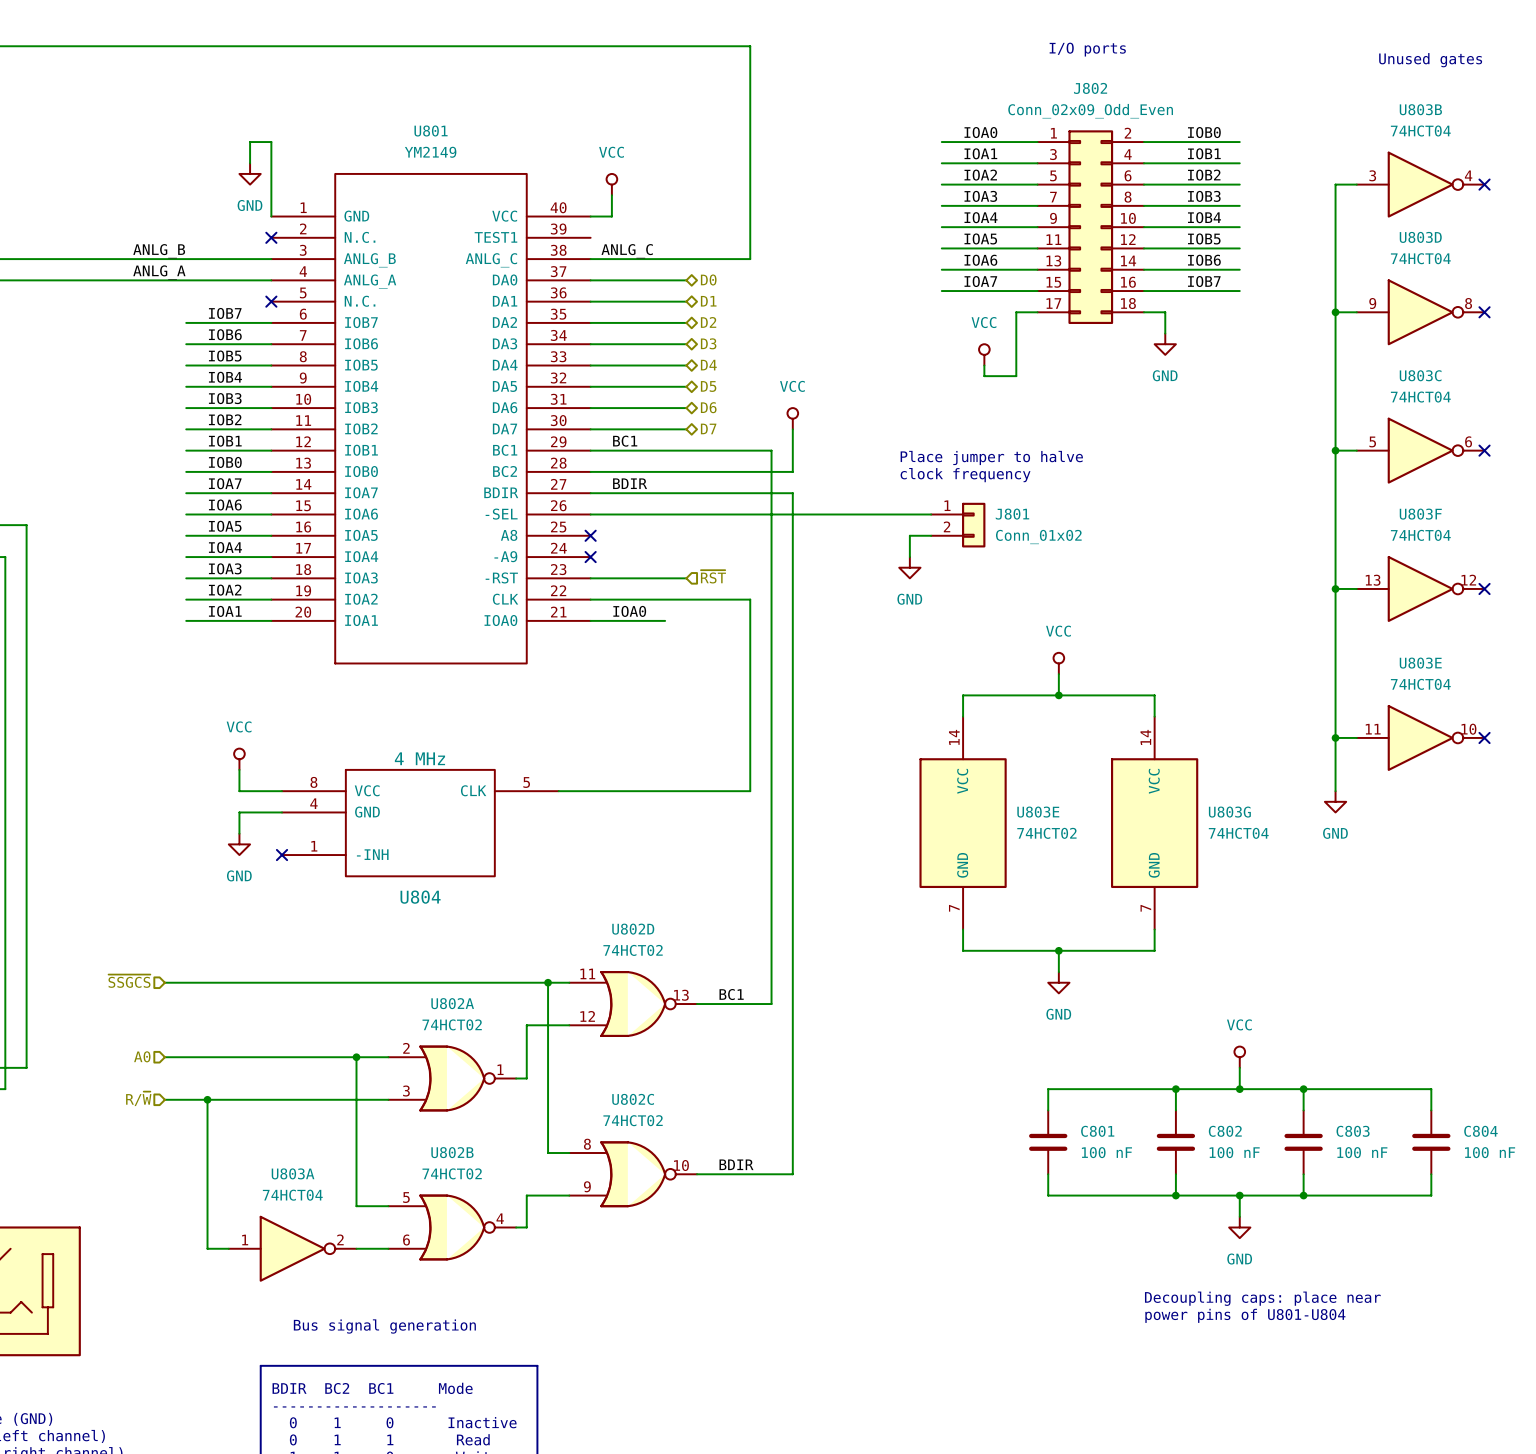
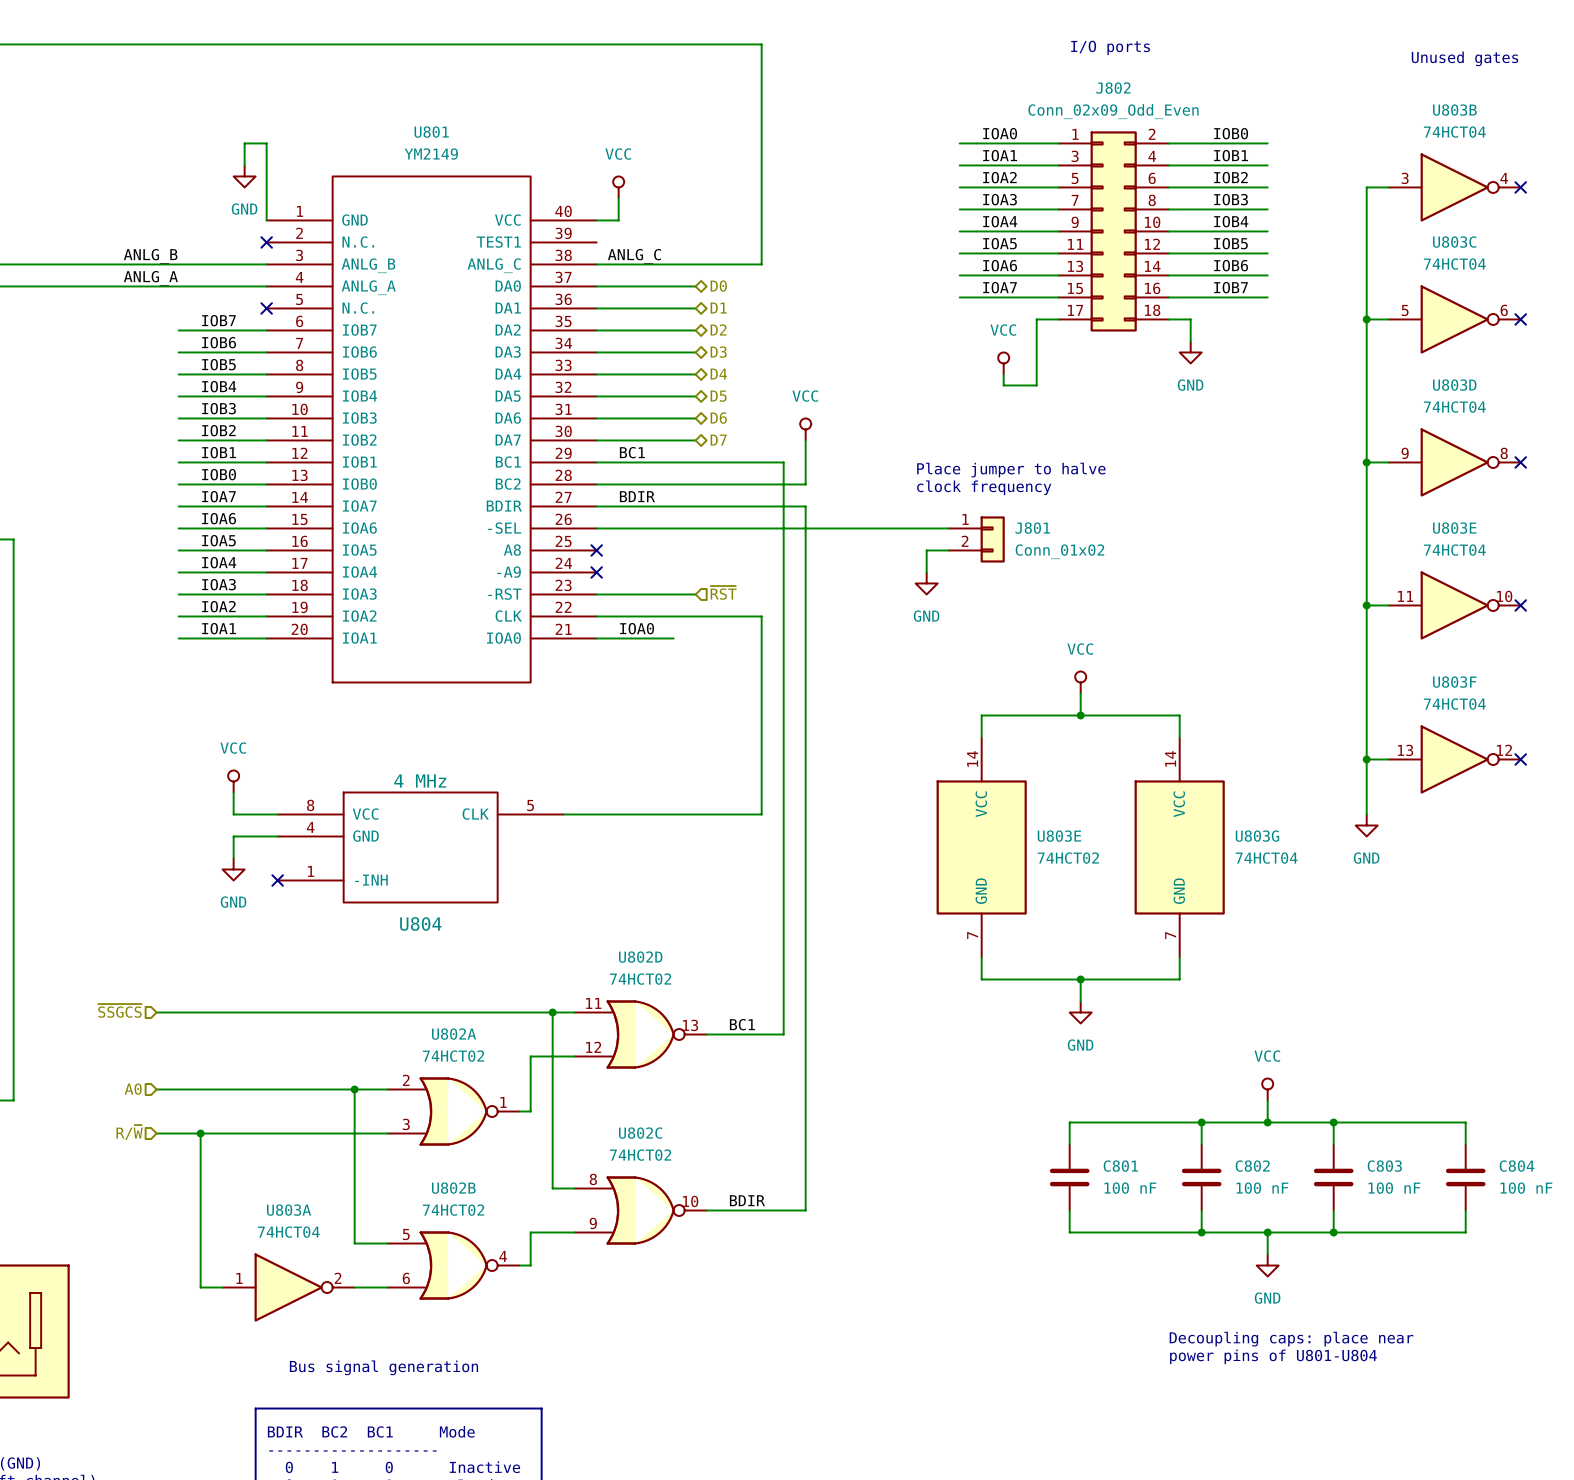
U803D position: (1420, 312) -> (1454, 462)
U803C position: (1420, 450) -> (1454, 319)
U803F position: (1420, 588) -> (1454, 759)
U803E position: (1420, 737) -> (1454, 605)

